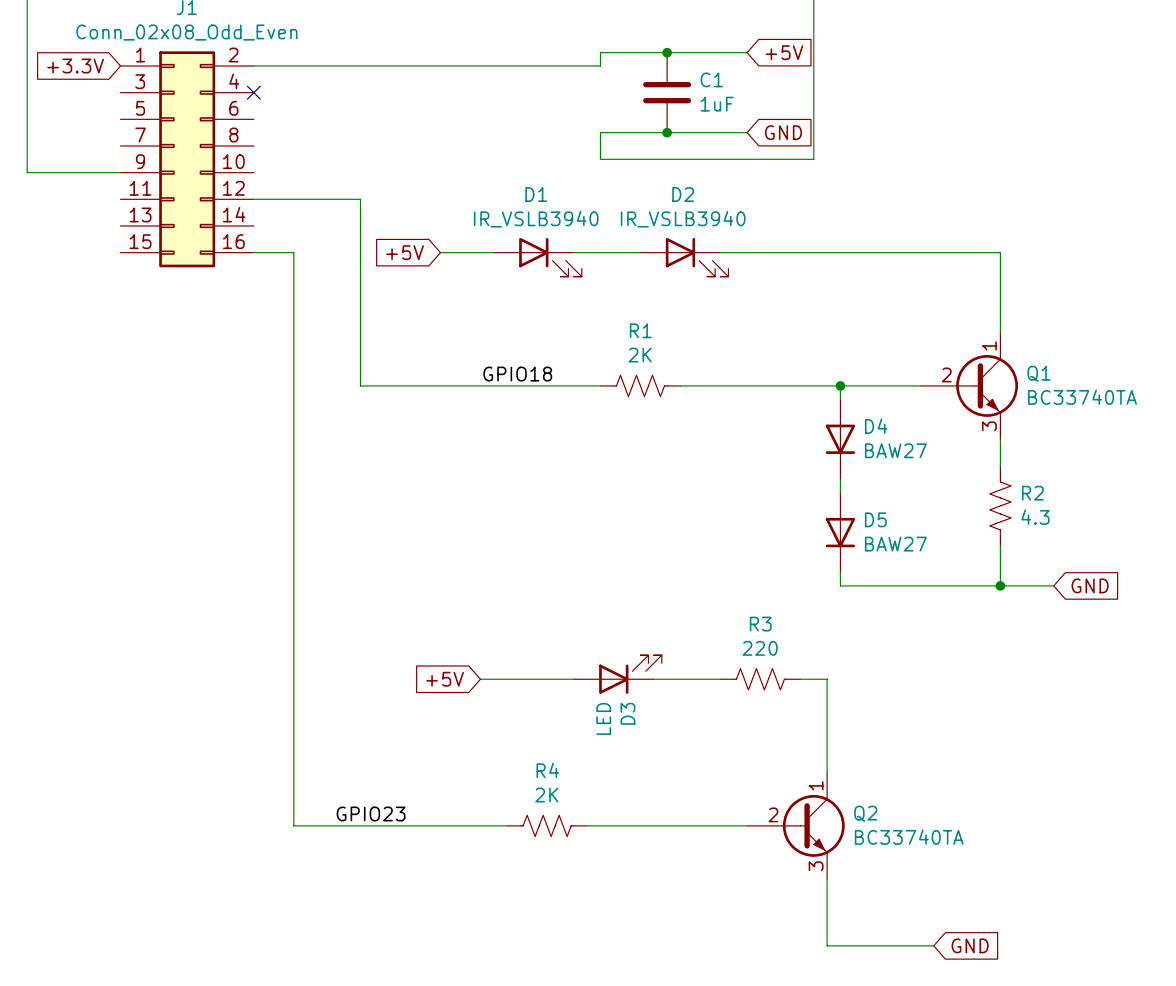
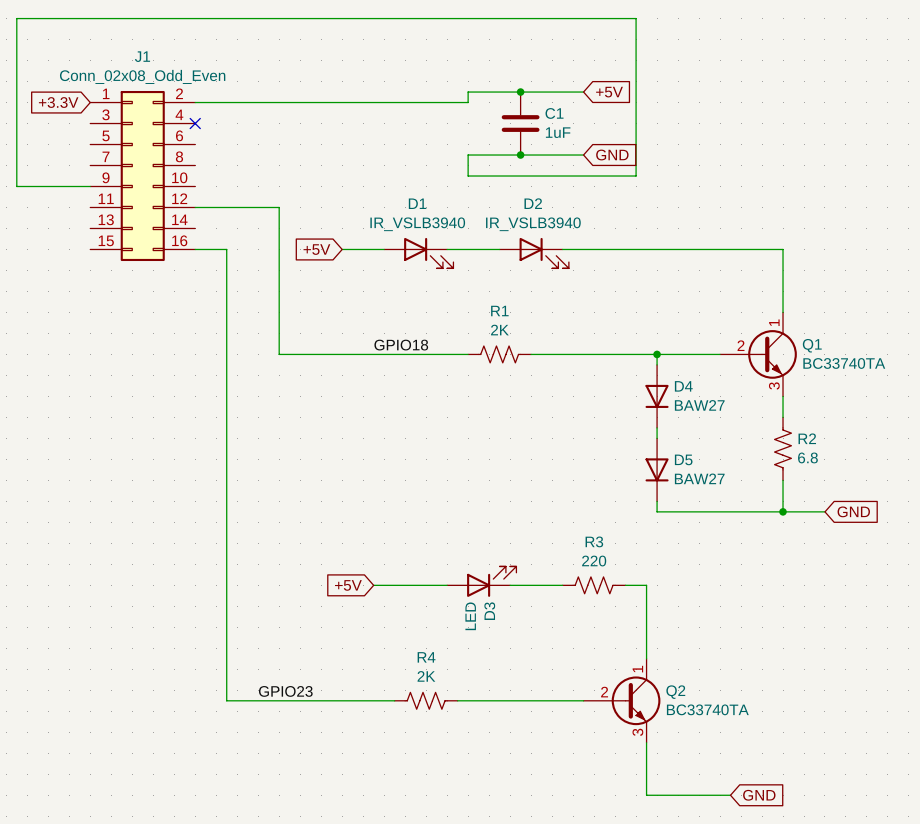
R2 value: 4.3 (1035, 517) -> 6.8 (807, 457)

